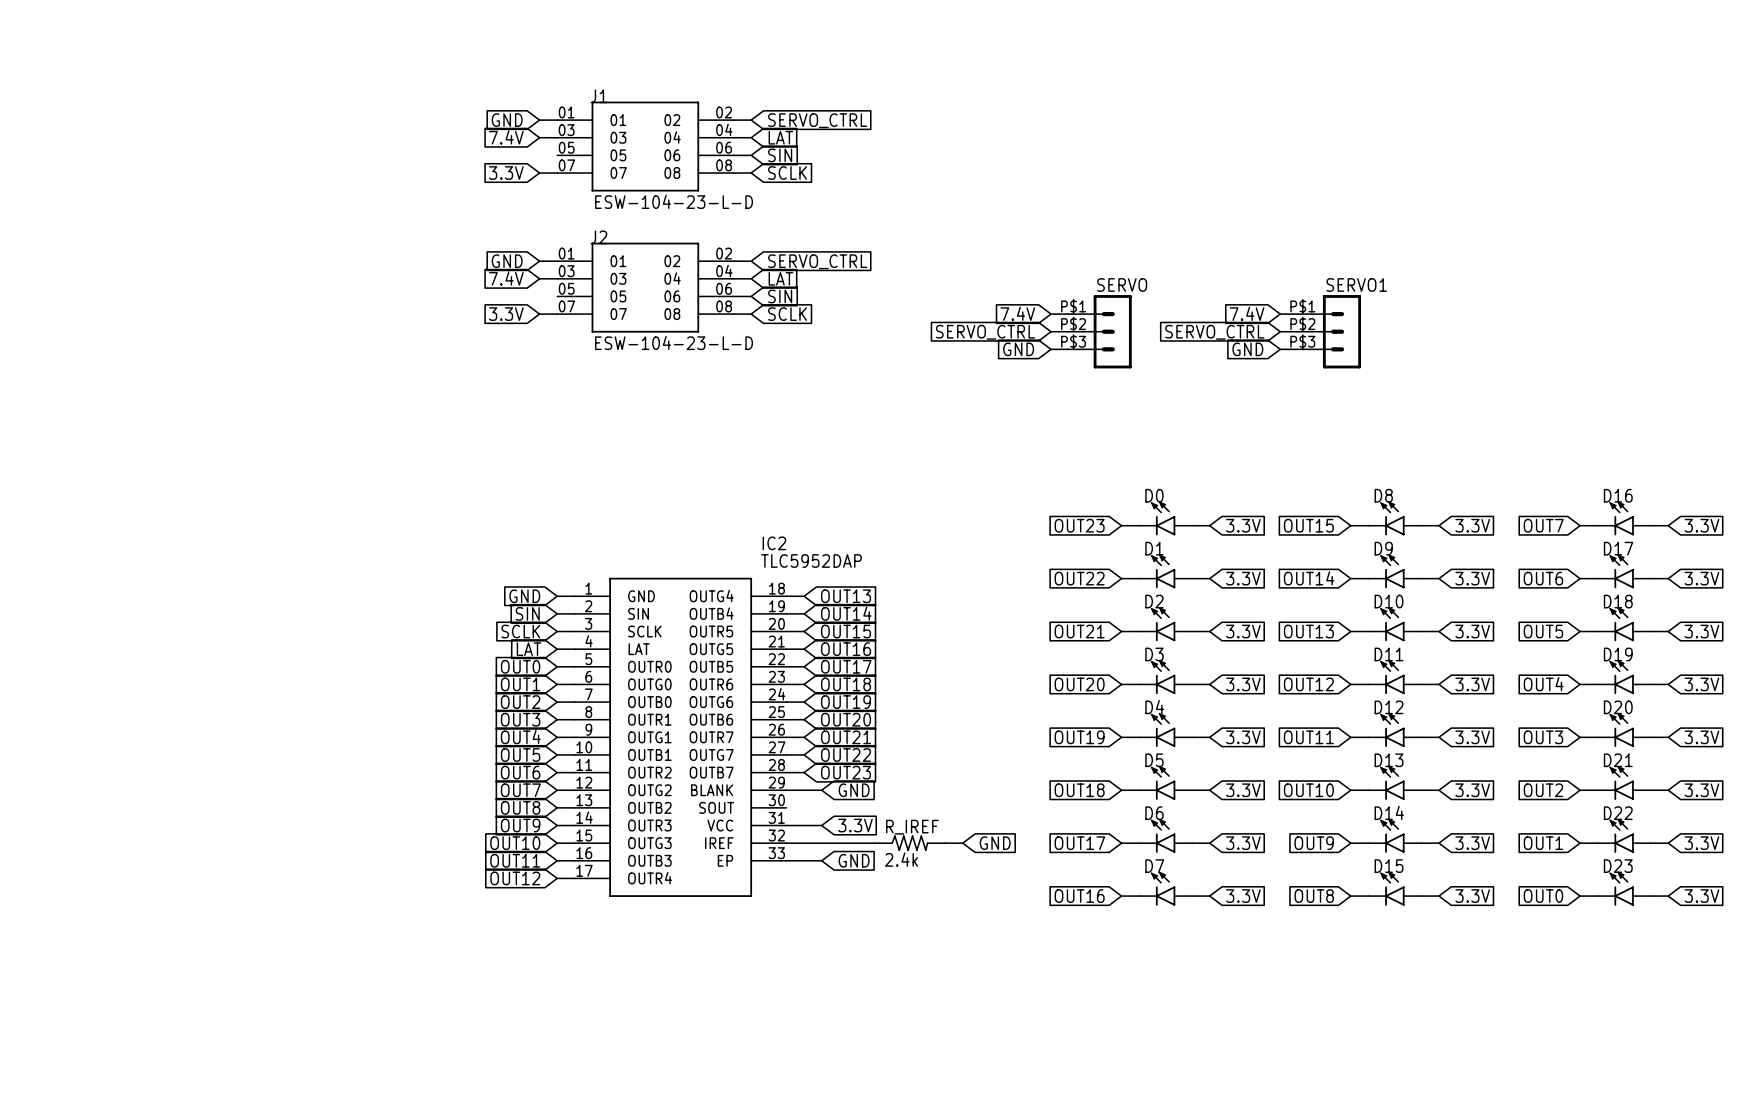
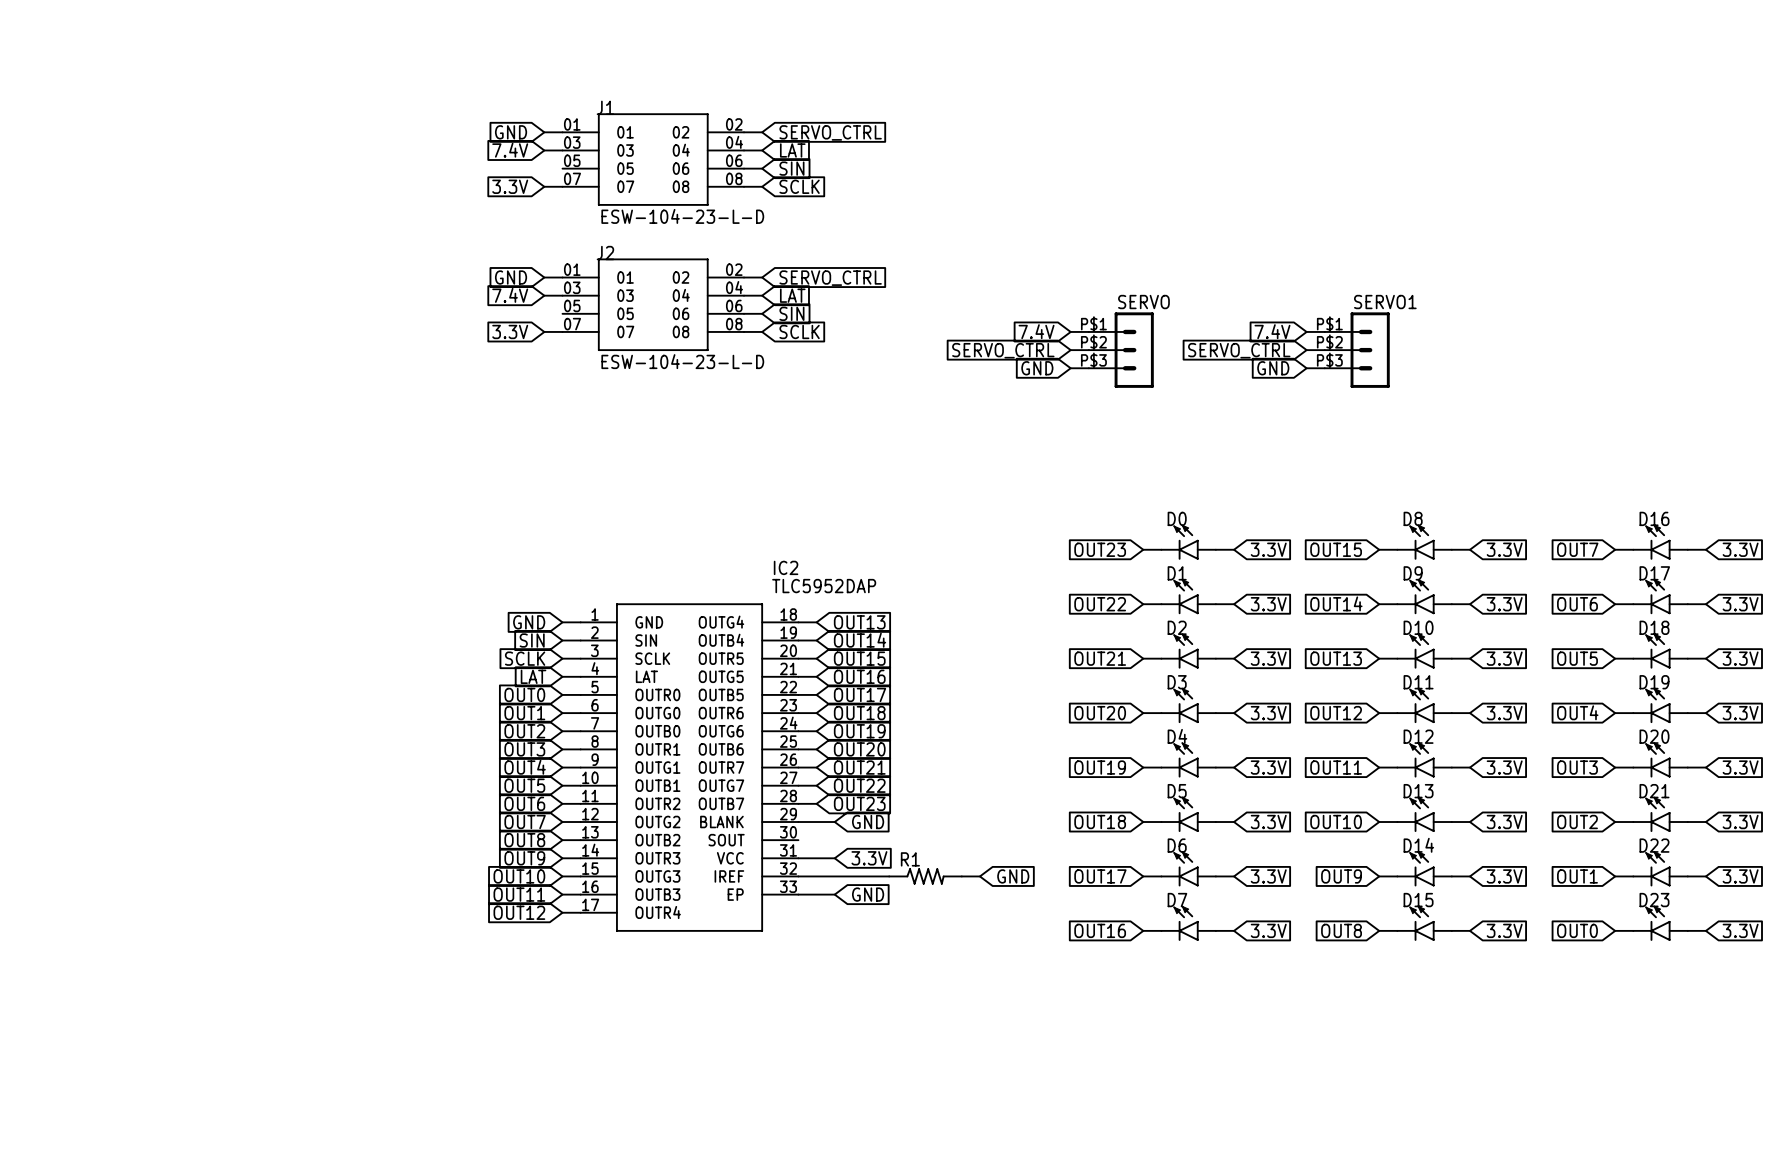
R_IREF name: R_IREF (912, 827) -> R1 (910, 859)
R_IREF value: 2.4k (901, 859) -> none

